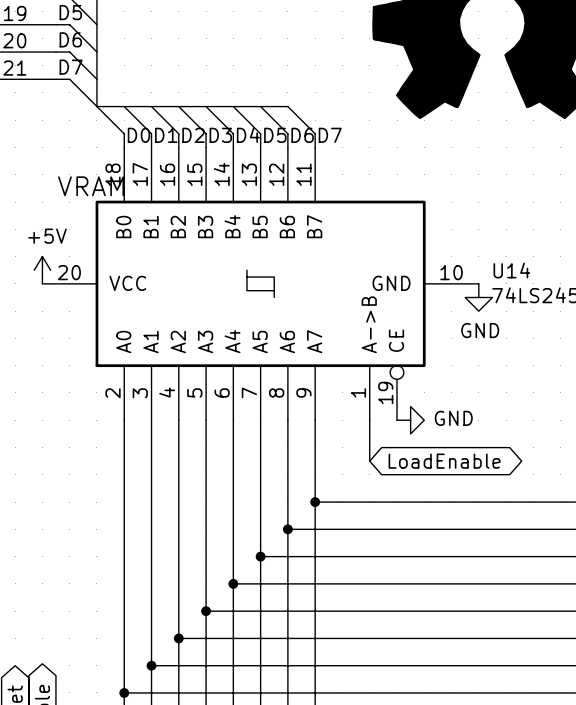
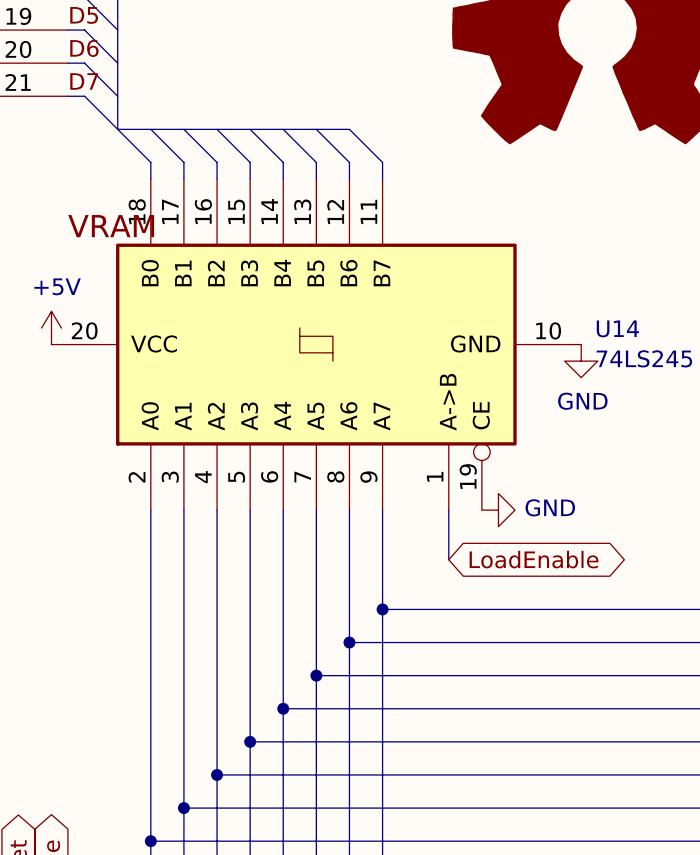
label: D4 (248, 134) -> none
label: D0 (138, 135) -> none
label: D1 (166, 135) -> none
label: D2 (193, 135) -> none
label: D3 (220, 135) -> none
label: D5 (275, 135) -> none
label: D6 (302, 135) -> none
label: D7 (330, 135) -> none

